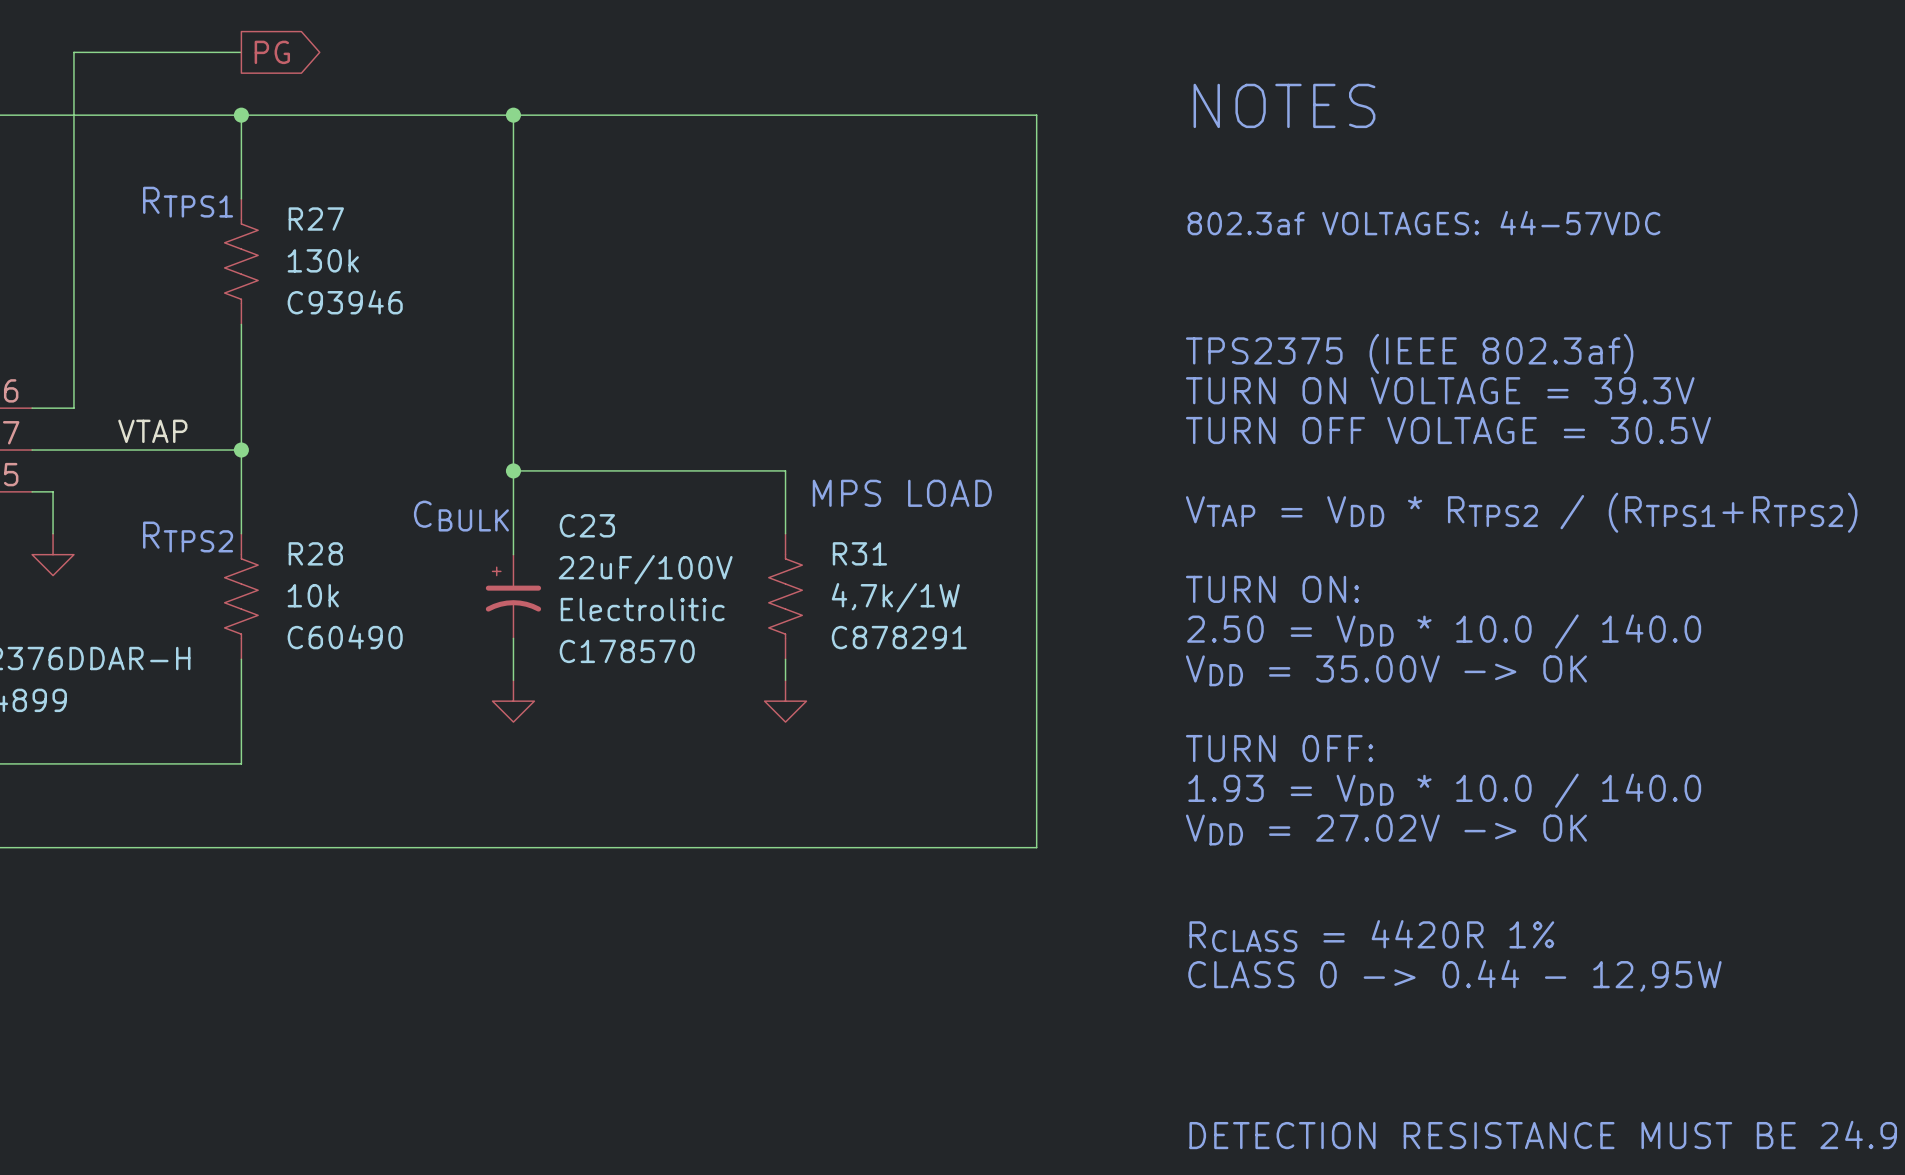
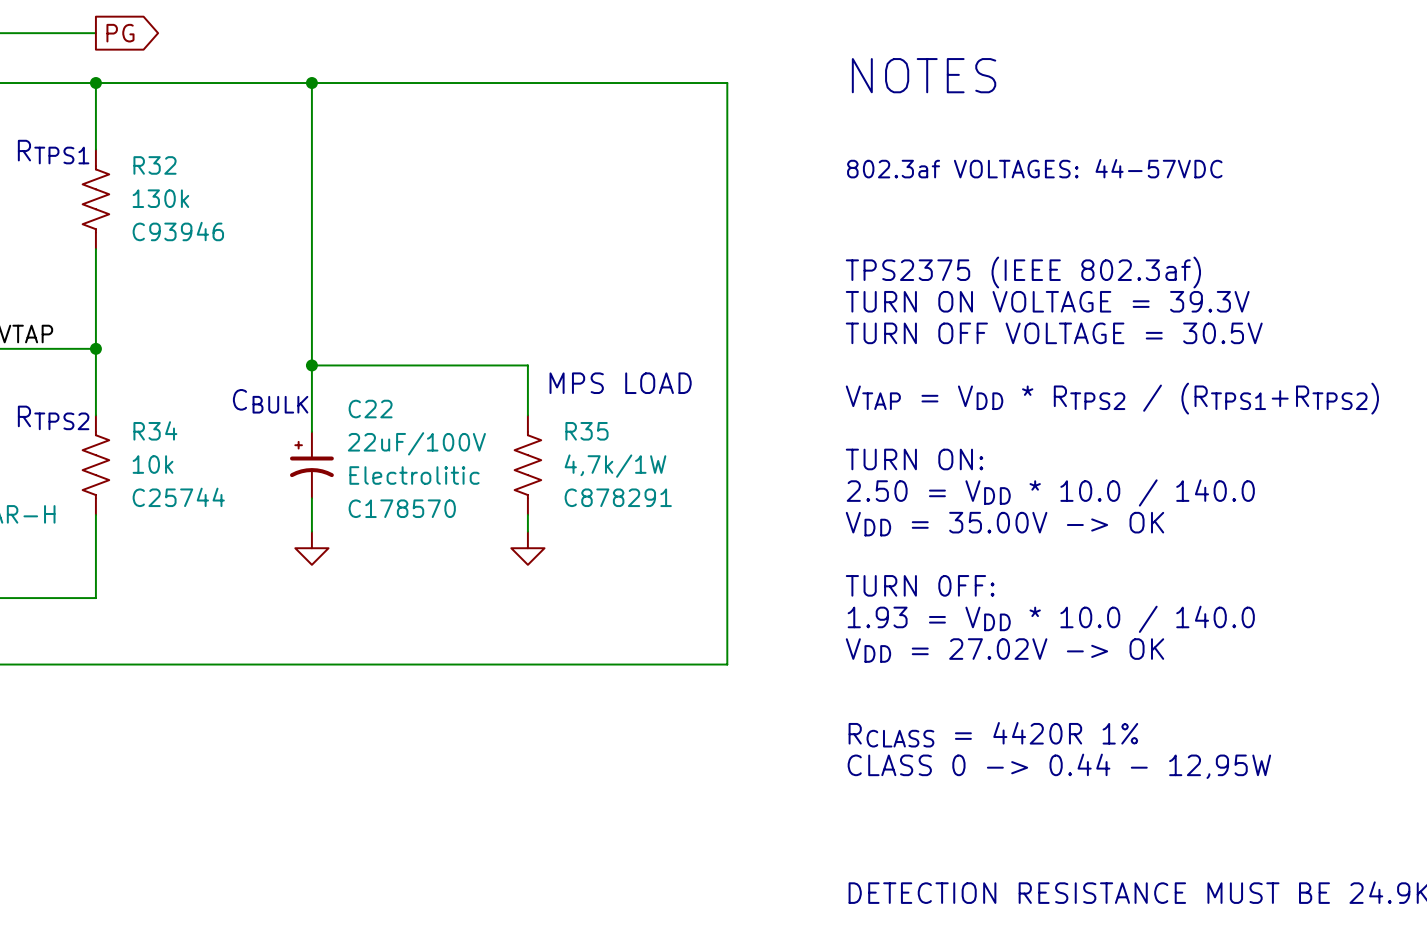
R27 name: R27 (316, 219) -> R32 (155, 165)
C23 name: C23 (587, 525) -> C22 (370, 409)
R28 name: R28 (315, 553) -> R34 (155, 430)
R31 name: R31 (859, 553) -> R35 (586, 431)
R28 text: C60490 (345, 637) -> C25744 (178, 497)

